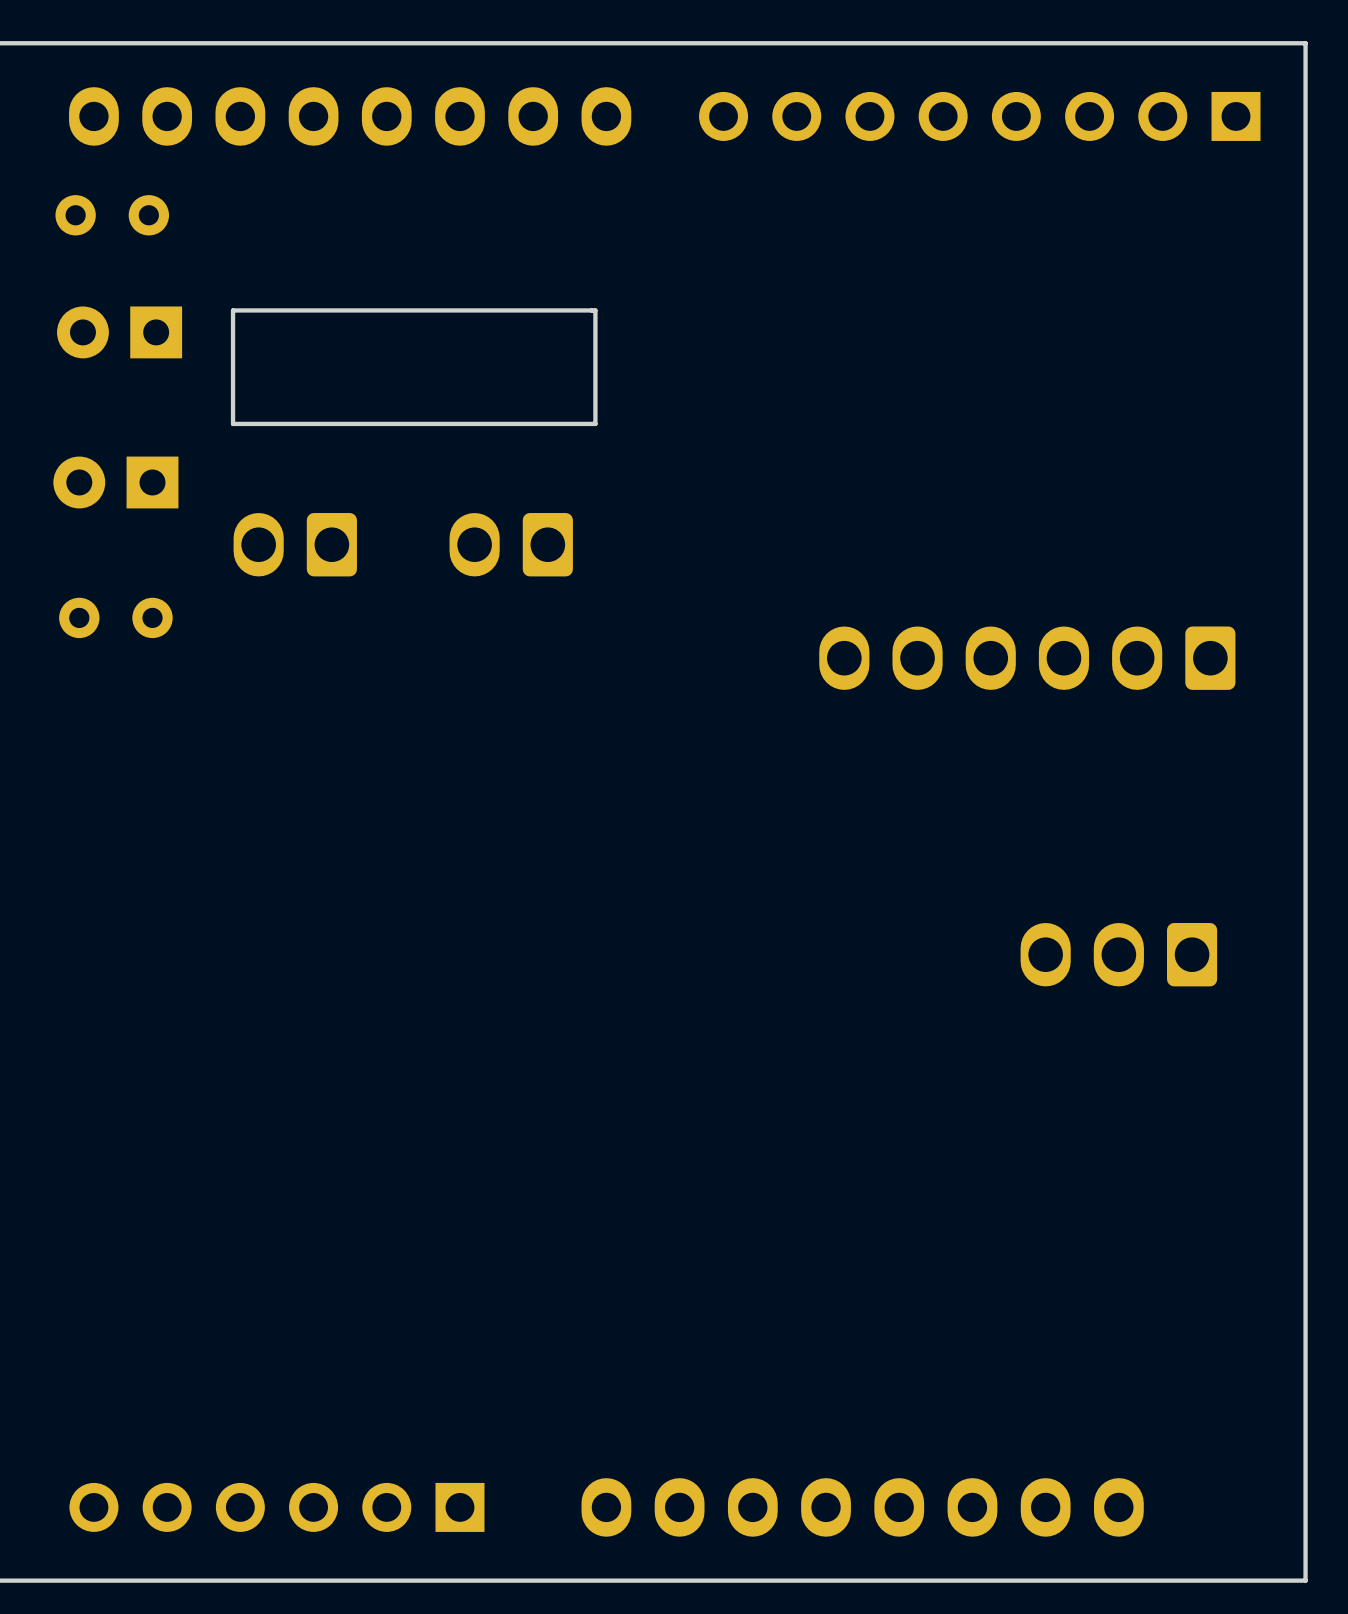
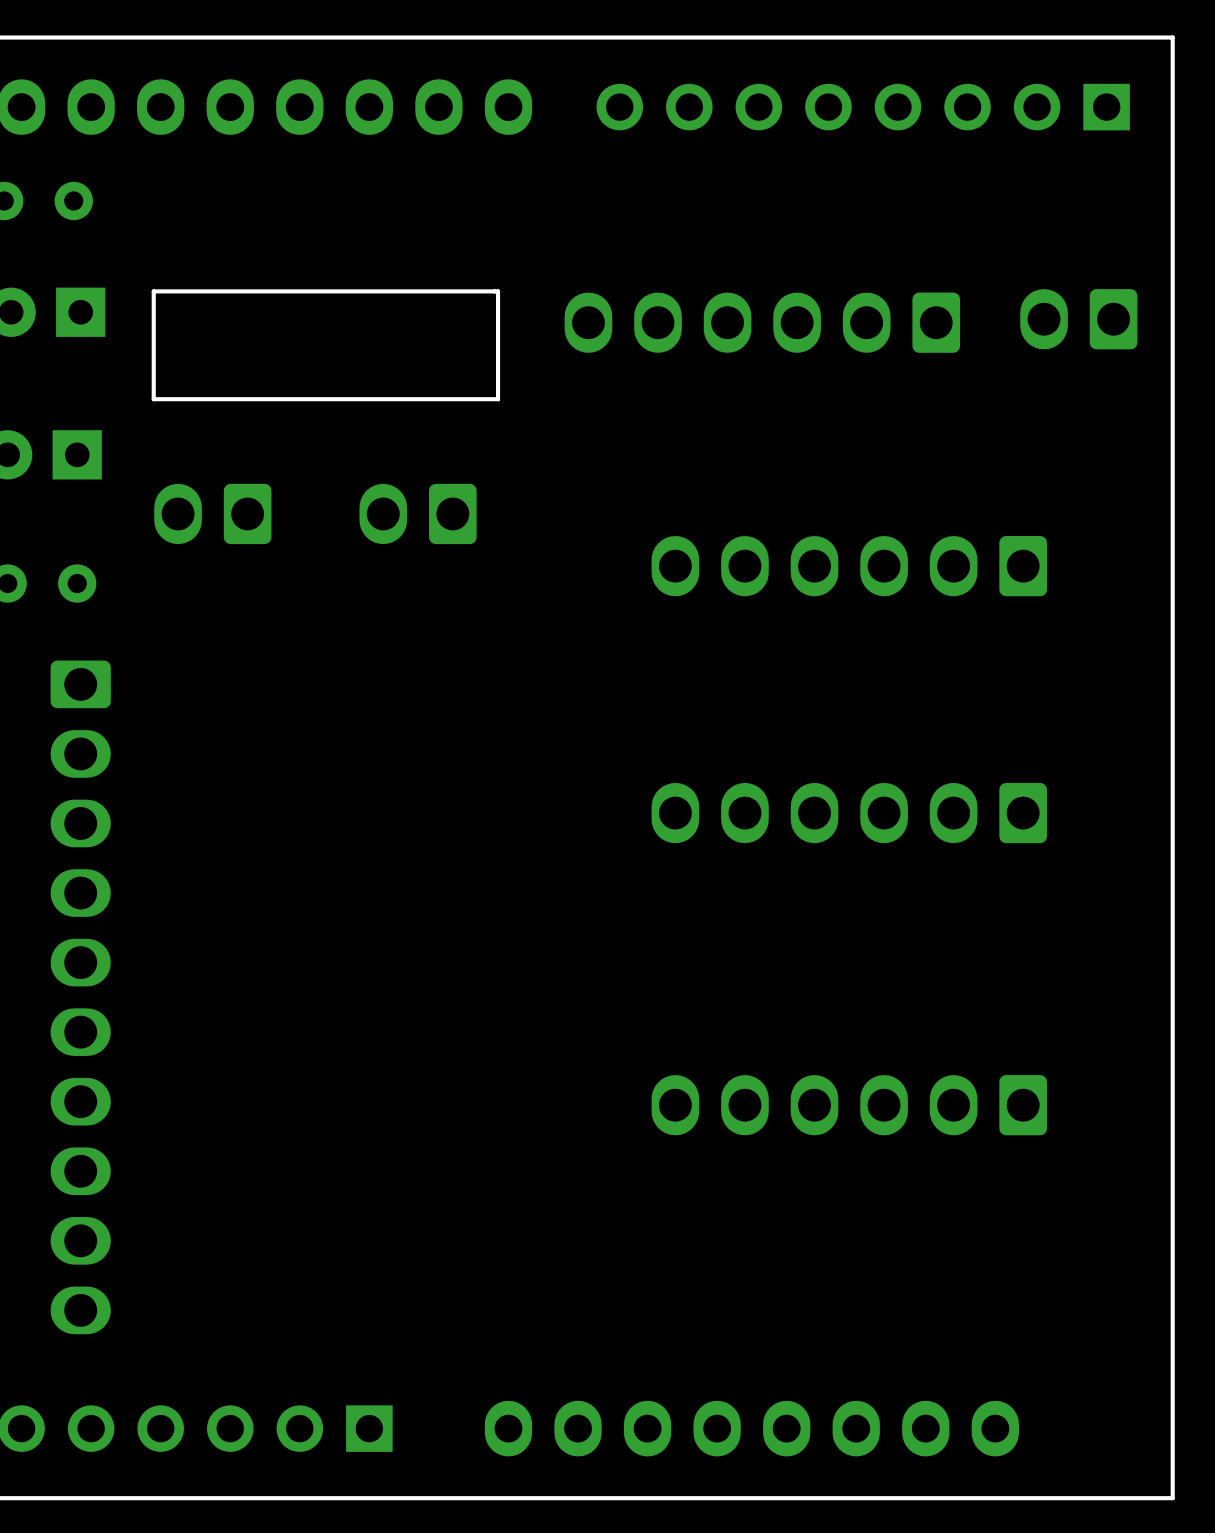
part: none -> (1078, 319)
part: none -> (762, 322)
part position: (1027, 658) -> (849, 566)
part: none -> (849, 813)
part: (1118, 954) -> none
part: none -> (80, 997)
part: none -> (849, 1105)

